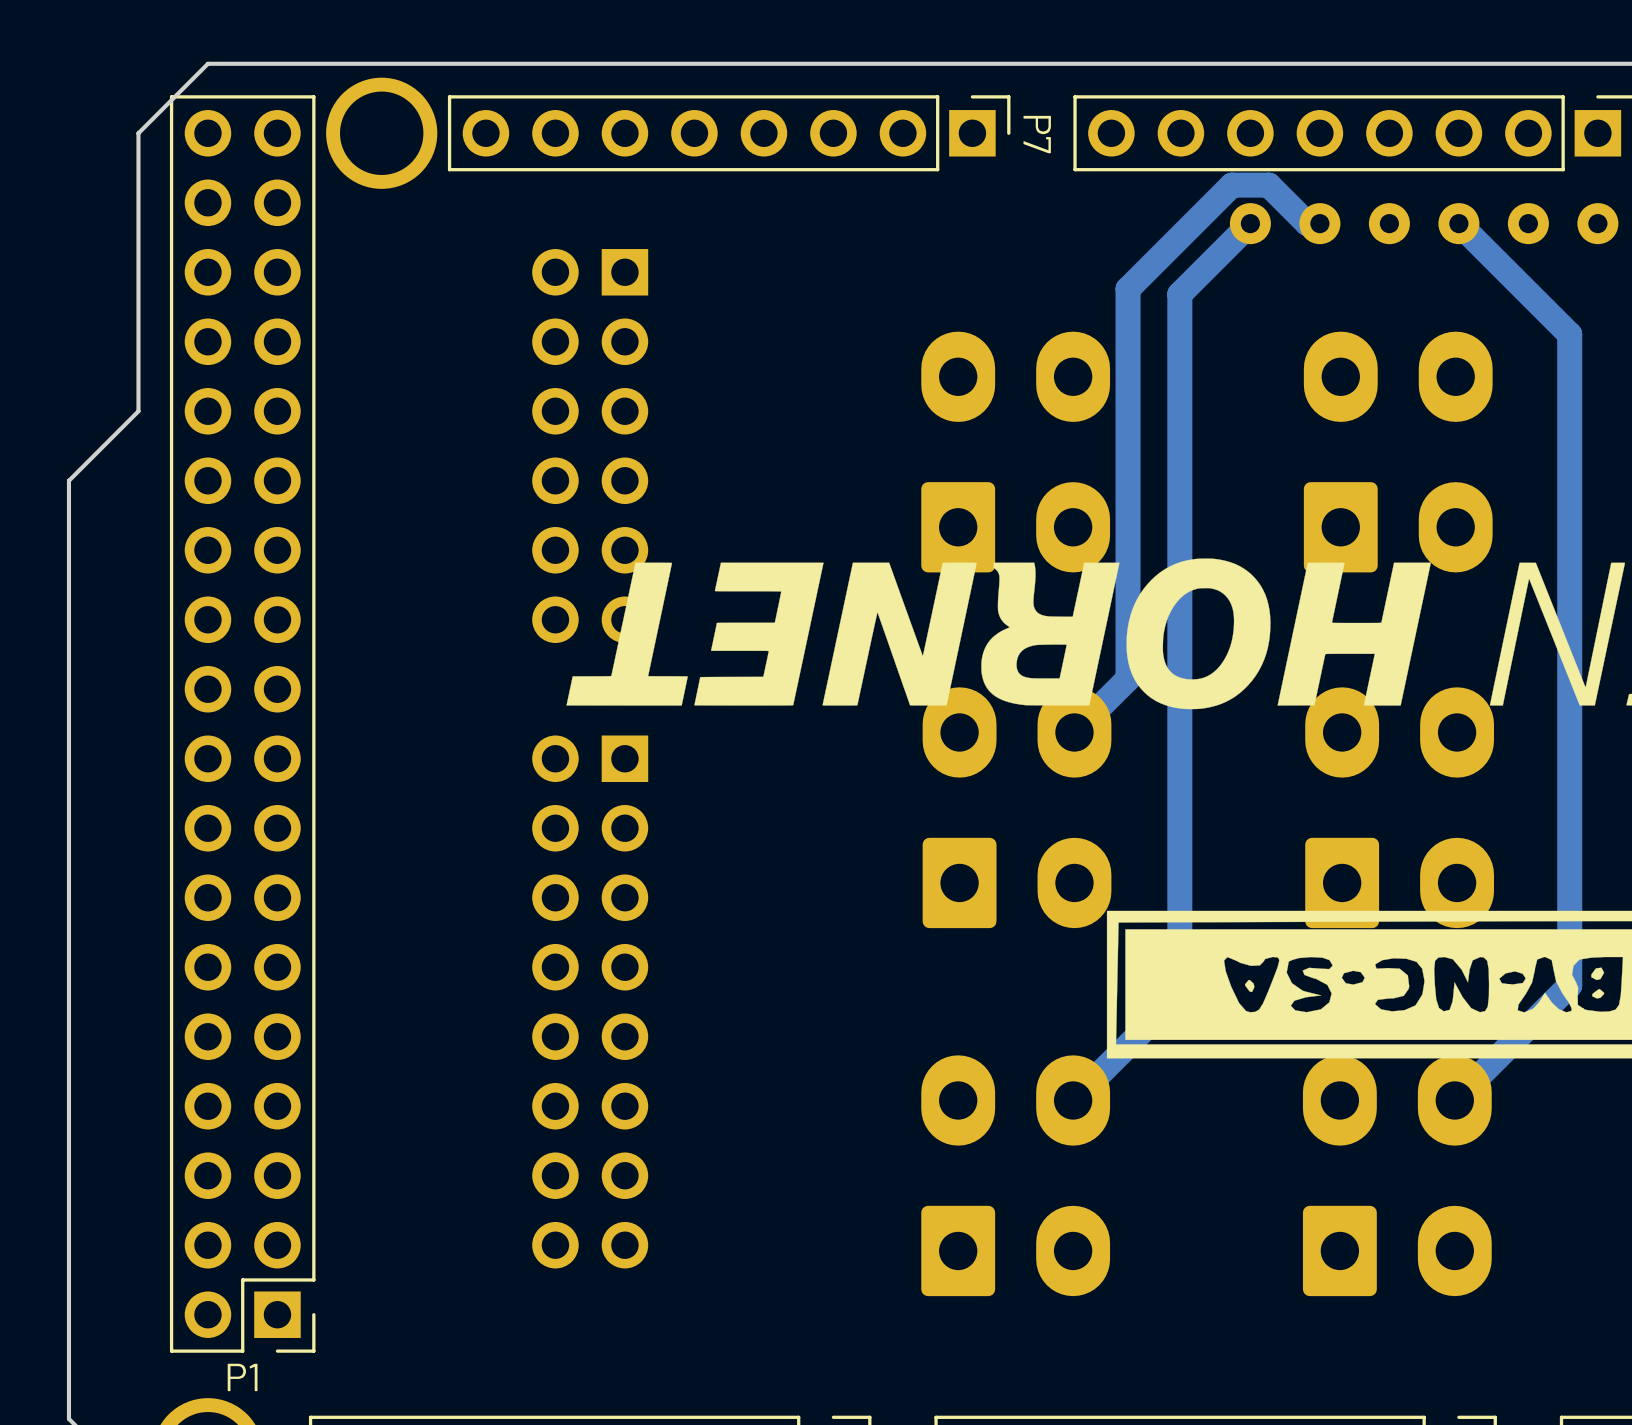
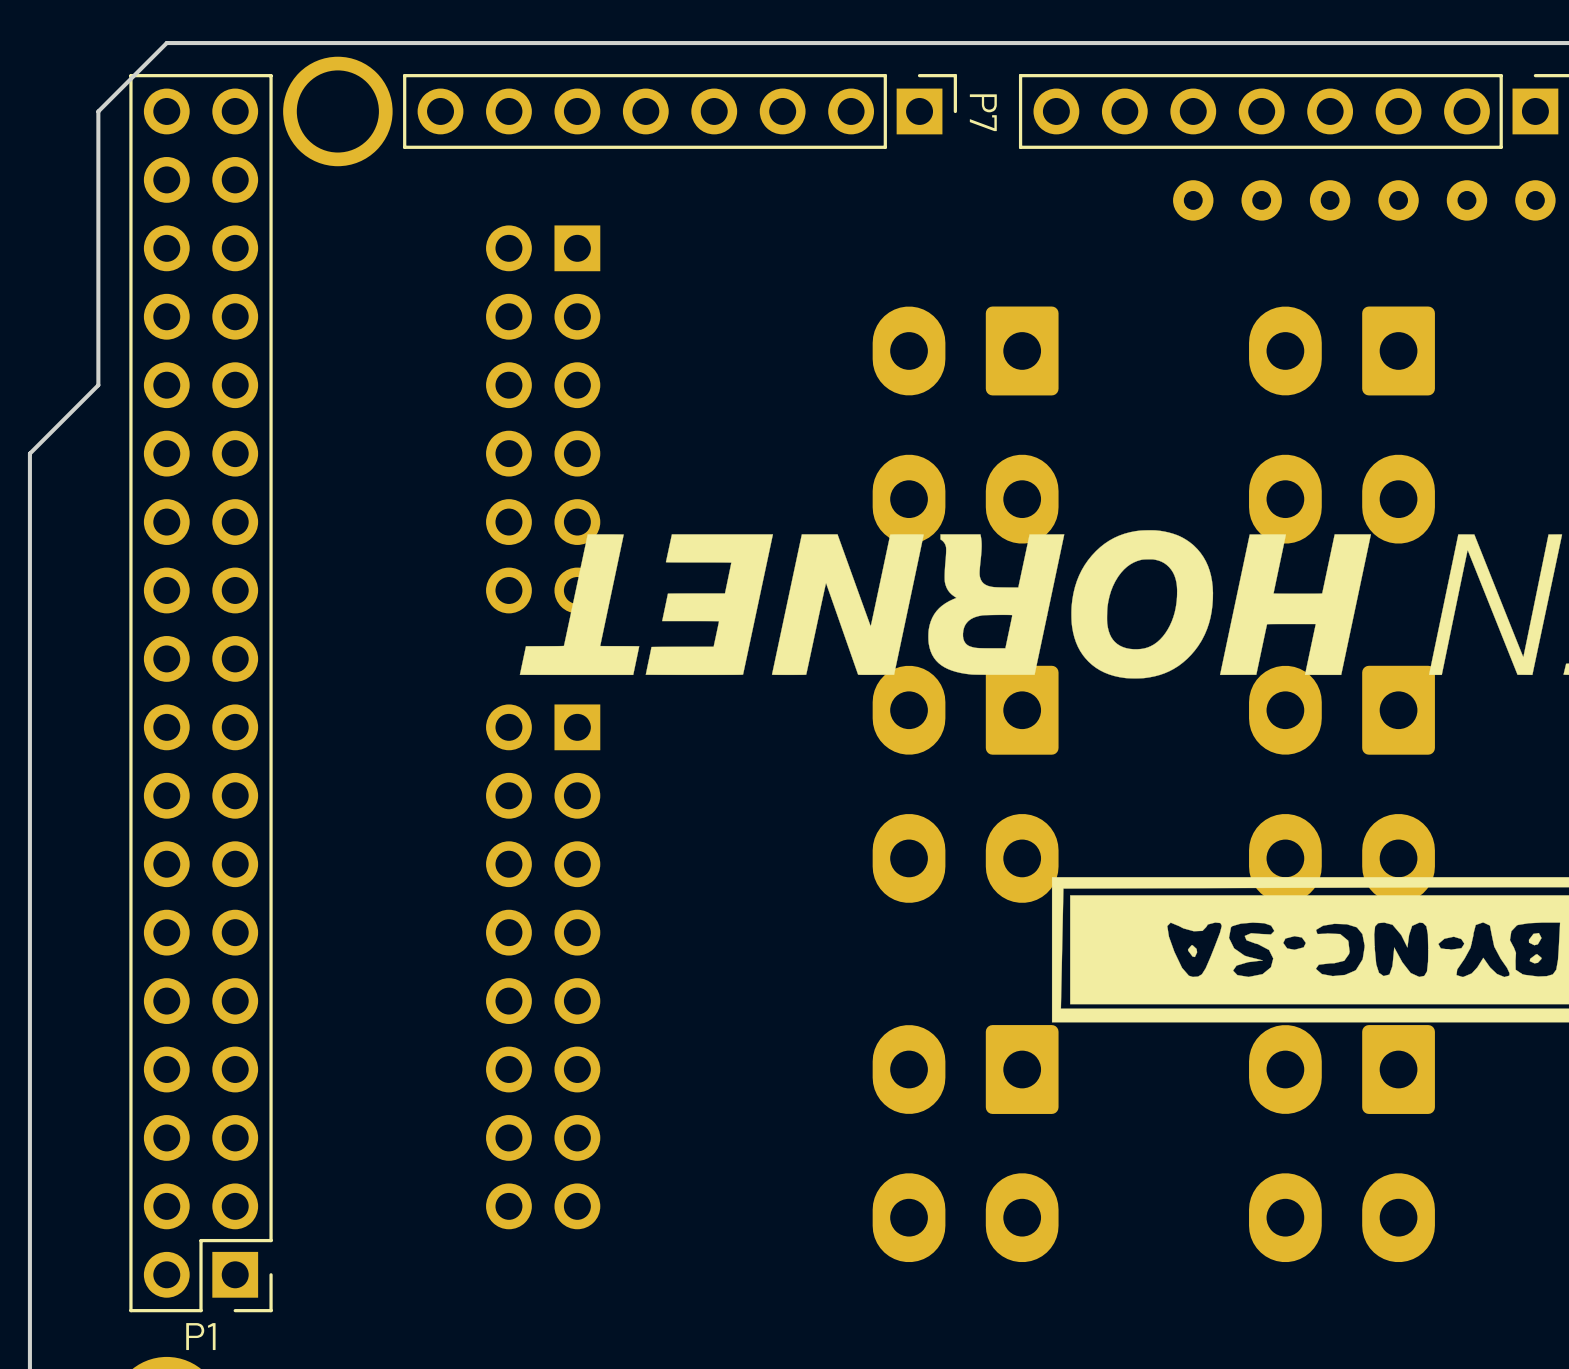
track: (1250, 223) (1179, 294) (1179, 993) (1073, 1100) -> none
track: (1319, 223) (1307, 223) (1268, 185) (1231, 185) (1128, 289) (1128, 678) (1074, 732) -> none
track: (1458, 223) (1569, 334) (1569, 985) (1454, 1100) -> none
part rotation: 0° (1015, 452) -> 180° (965, 425)
part rotation: 0° (1398, 452) -> 180° (1341, 425)
part rotation: 0° (1017, 807) -> 180° (965, 784)
part rotation: 0° (1399, 807) -> 180° (1341, 784)
part rotation: 0° (1015, 1175) -> 180° (965, 1143)
part rotation: 0° (1397, 1175) -> 180° (1341, 1143)

